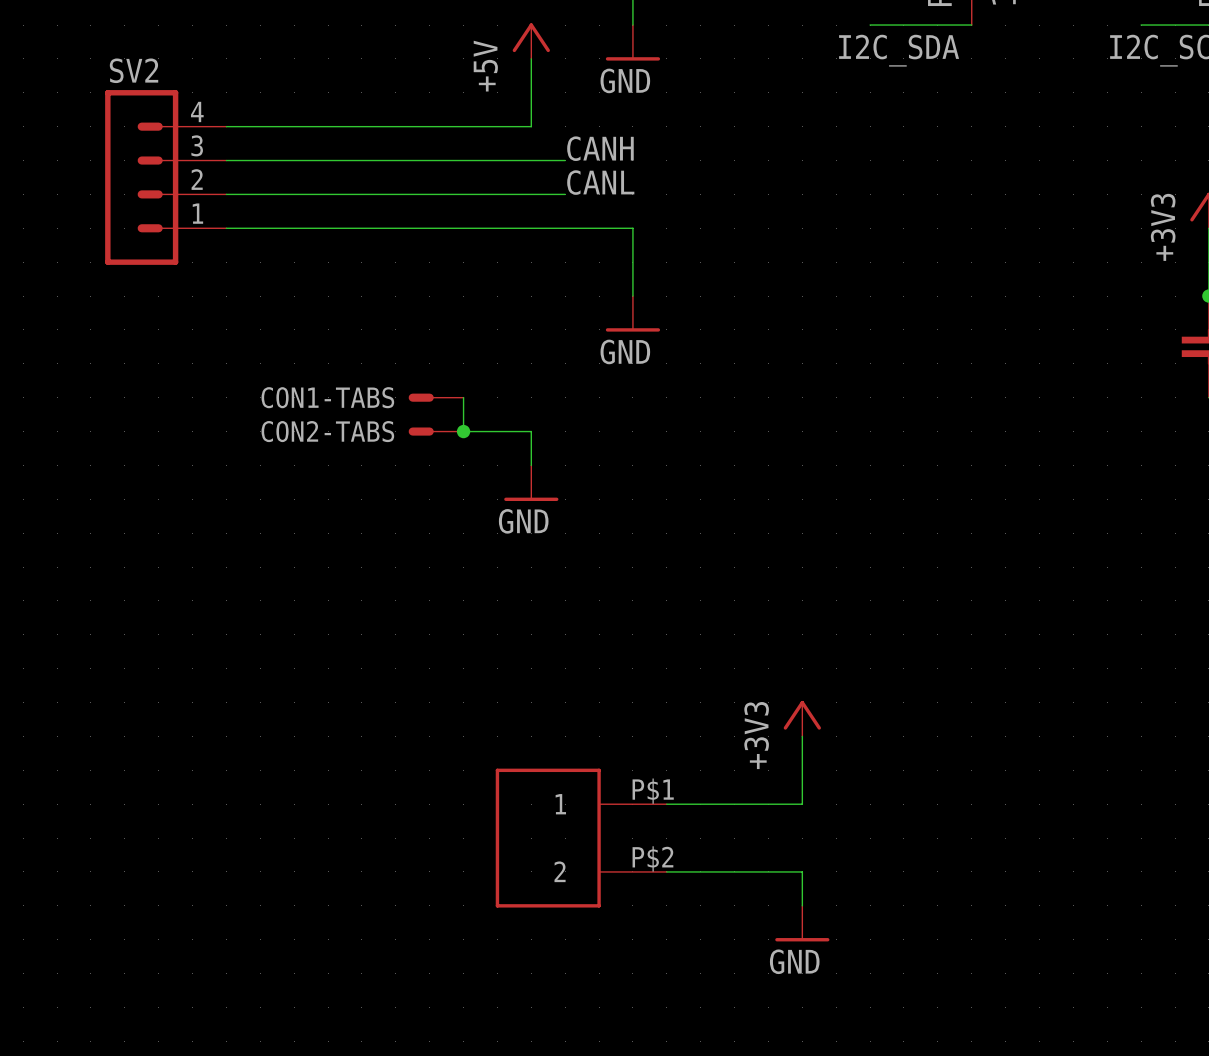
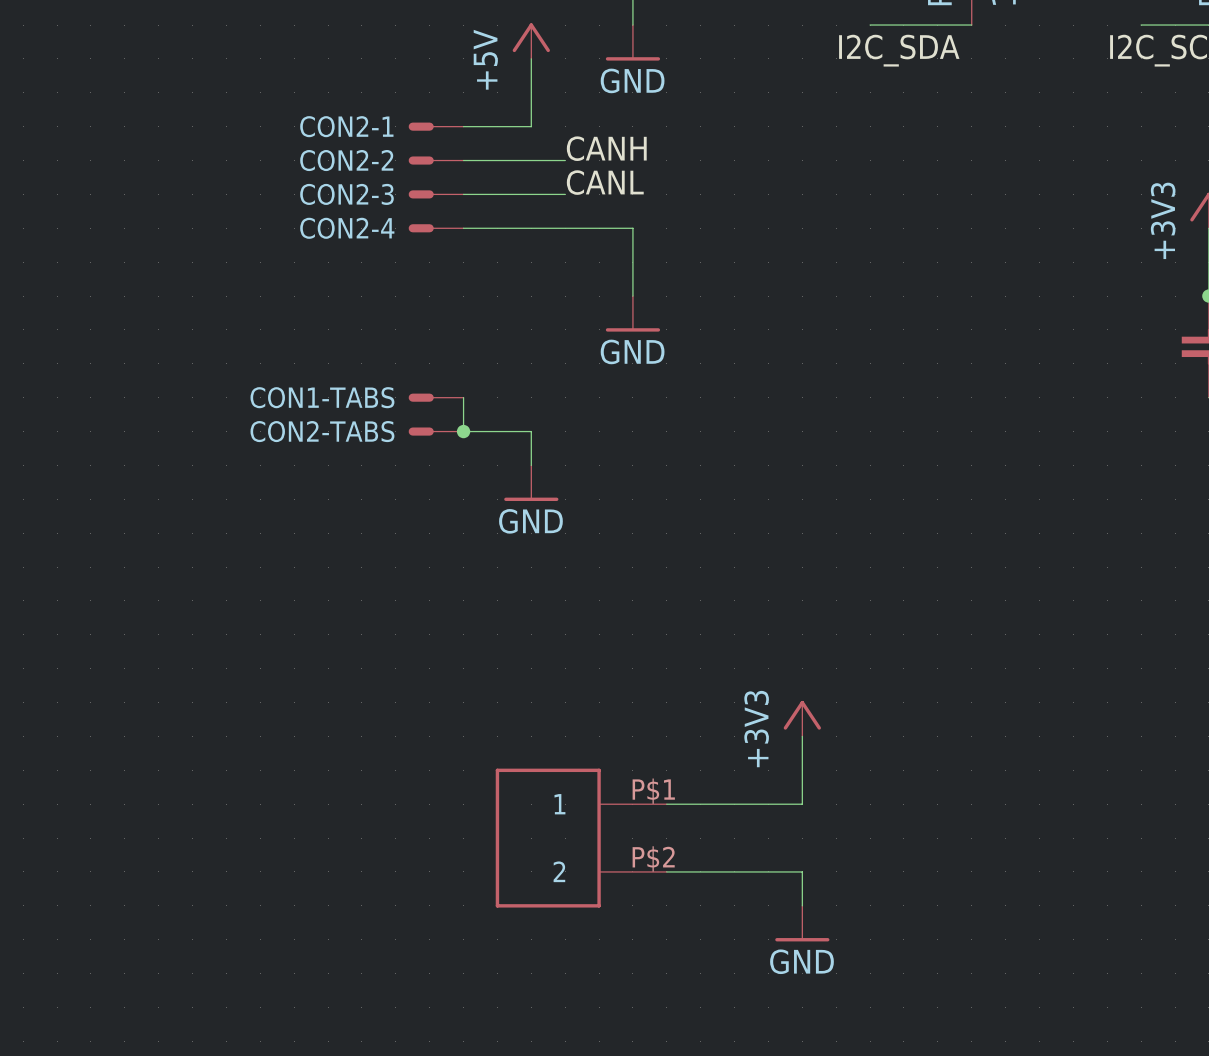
wire: (226, 126) (463, 126) -> none
CON2-1: none -> (436, 126)
wire: (226, 160) (463, 160) -> none
CON2-2: none -> (436, 160)
SV2: (165, 177) -> none
wire: (226, 194) (463, 194) -> none
CON2-3: none -> (436, 194)
wire: (226, 228) (463, 228) -> none
CON2-4: none -> (436, 228)

